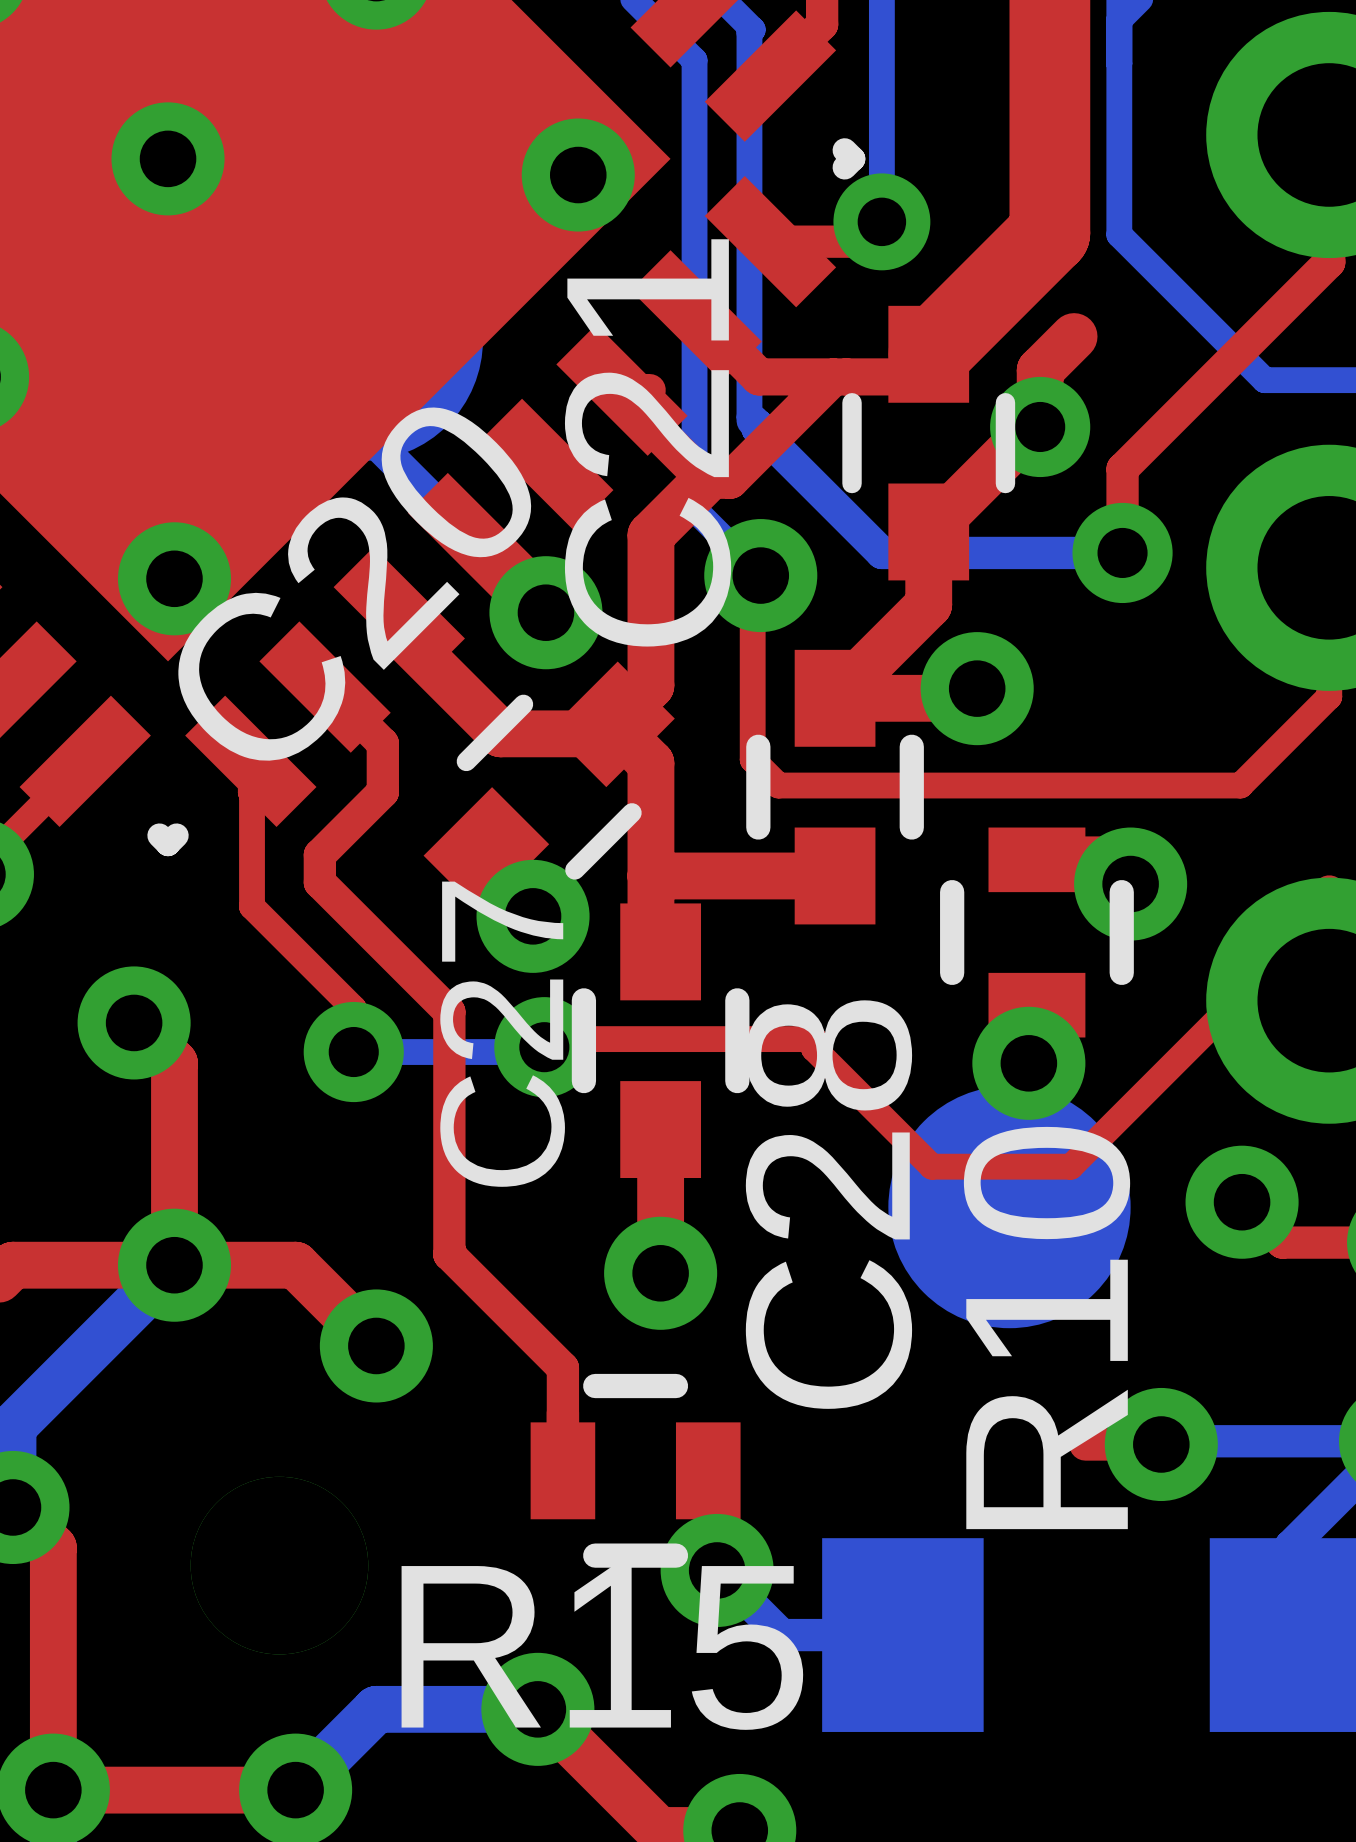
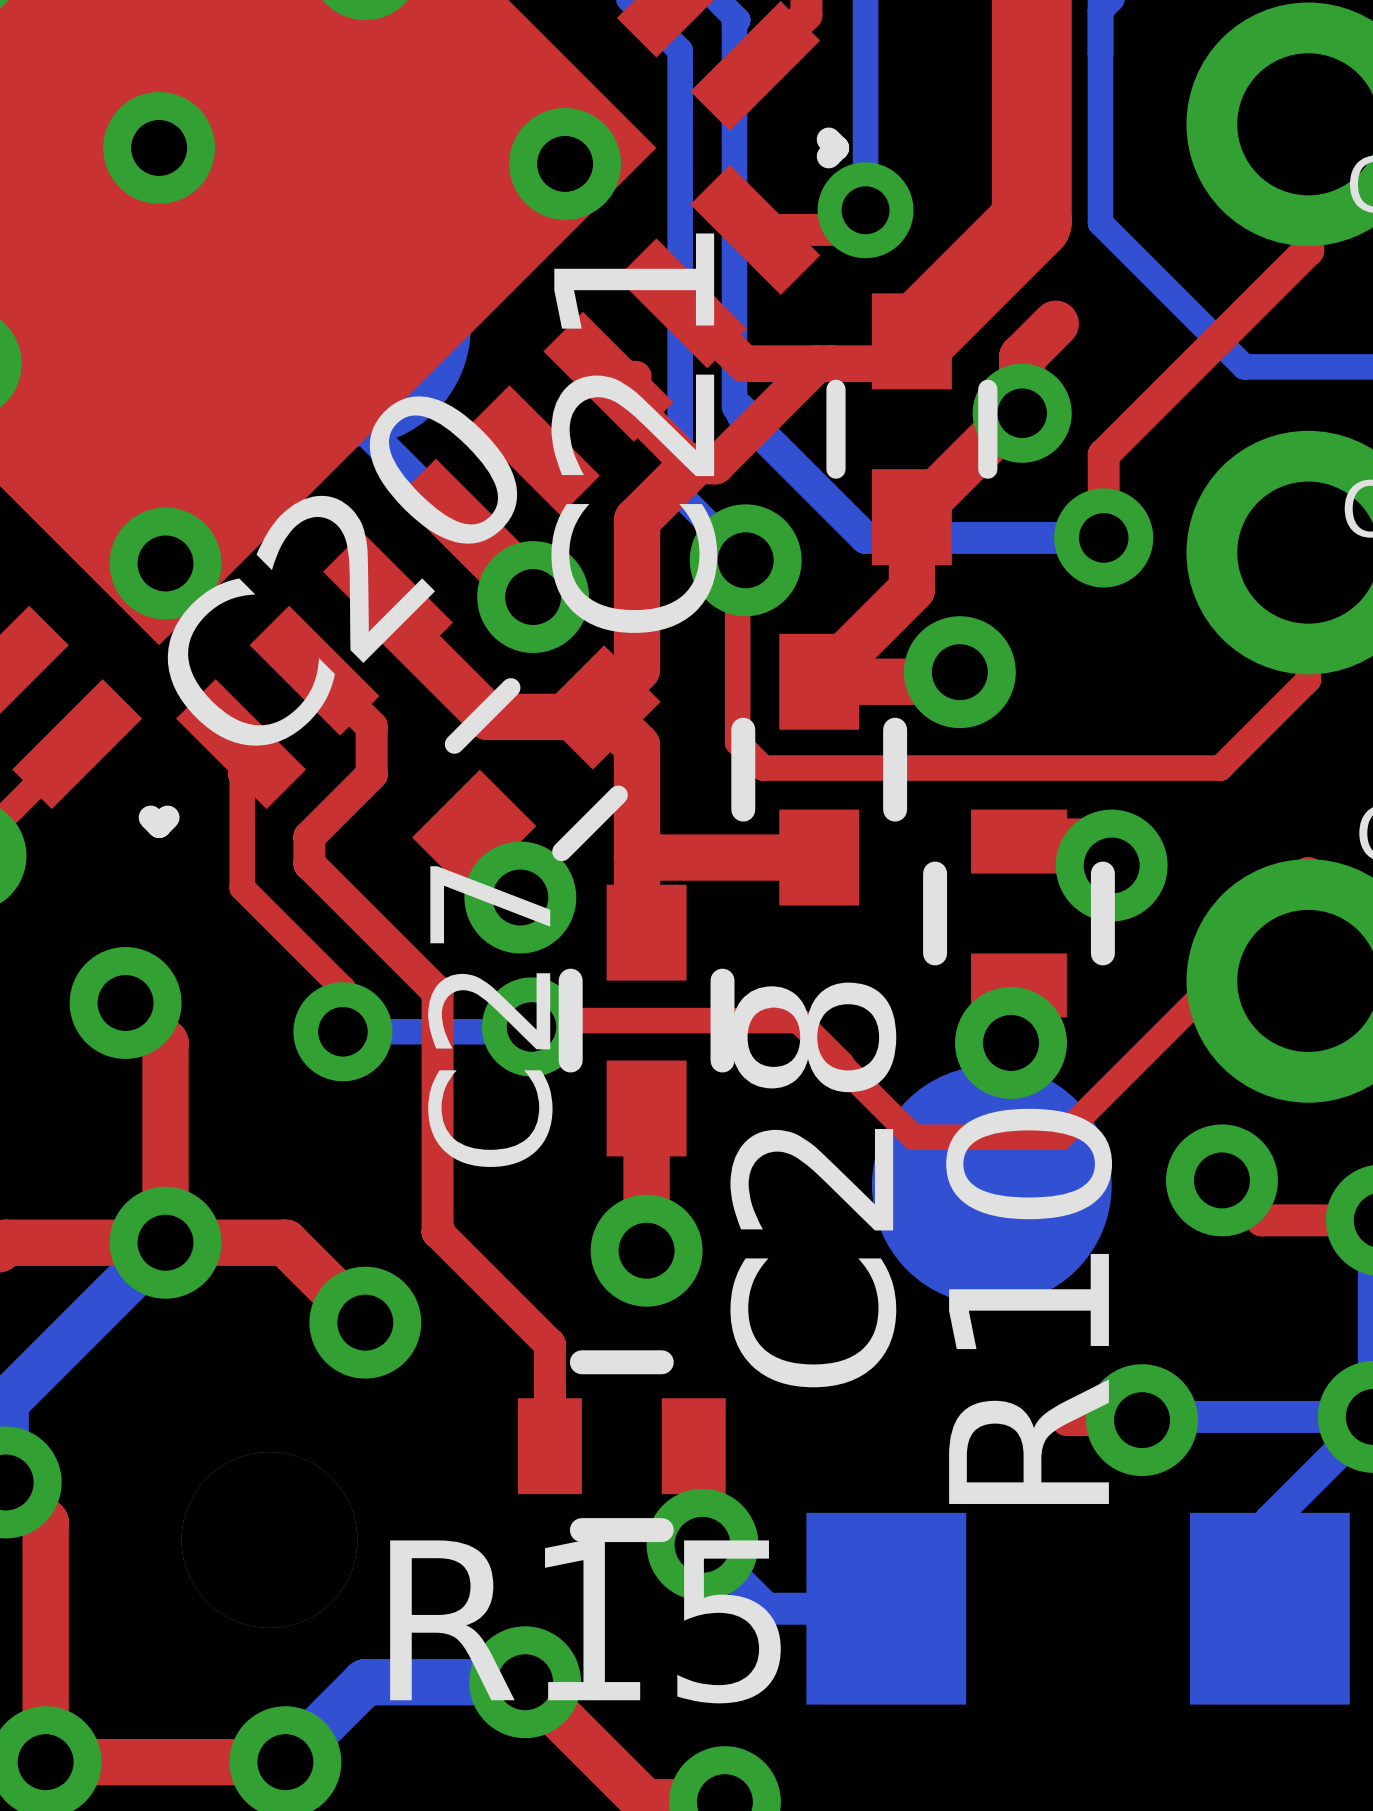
top track: (552, 1039) (814, 1039) (814, 1048) (931, 1166) (1070, 1166) (1078, 1158) -> (537, 1020) (798, 1020) (841, 1063)
top track: none -> (841, 1065) (913, 1137) (1060, 1137)

